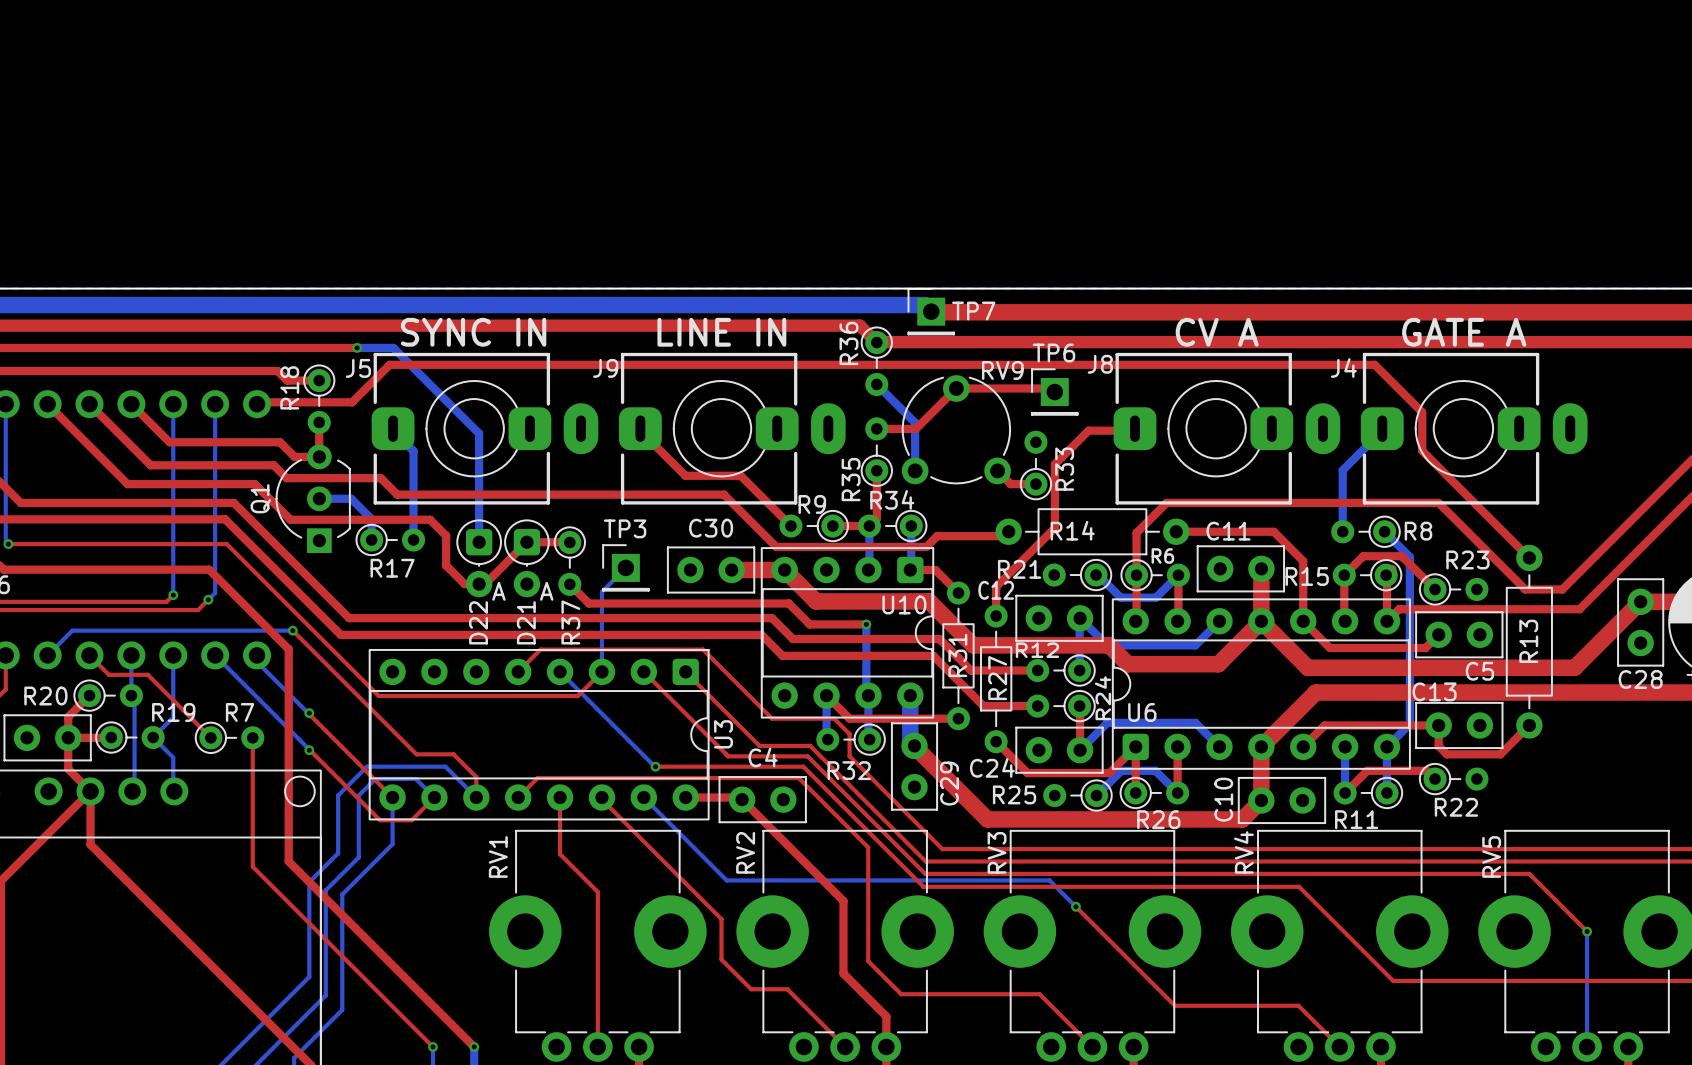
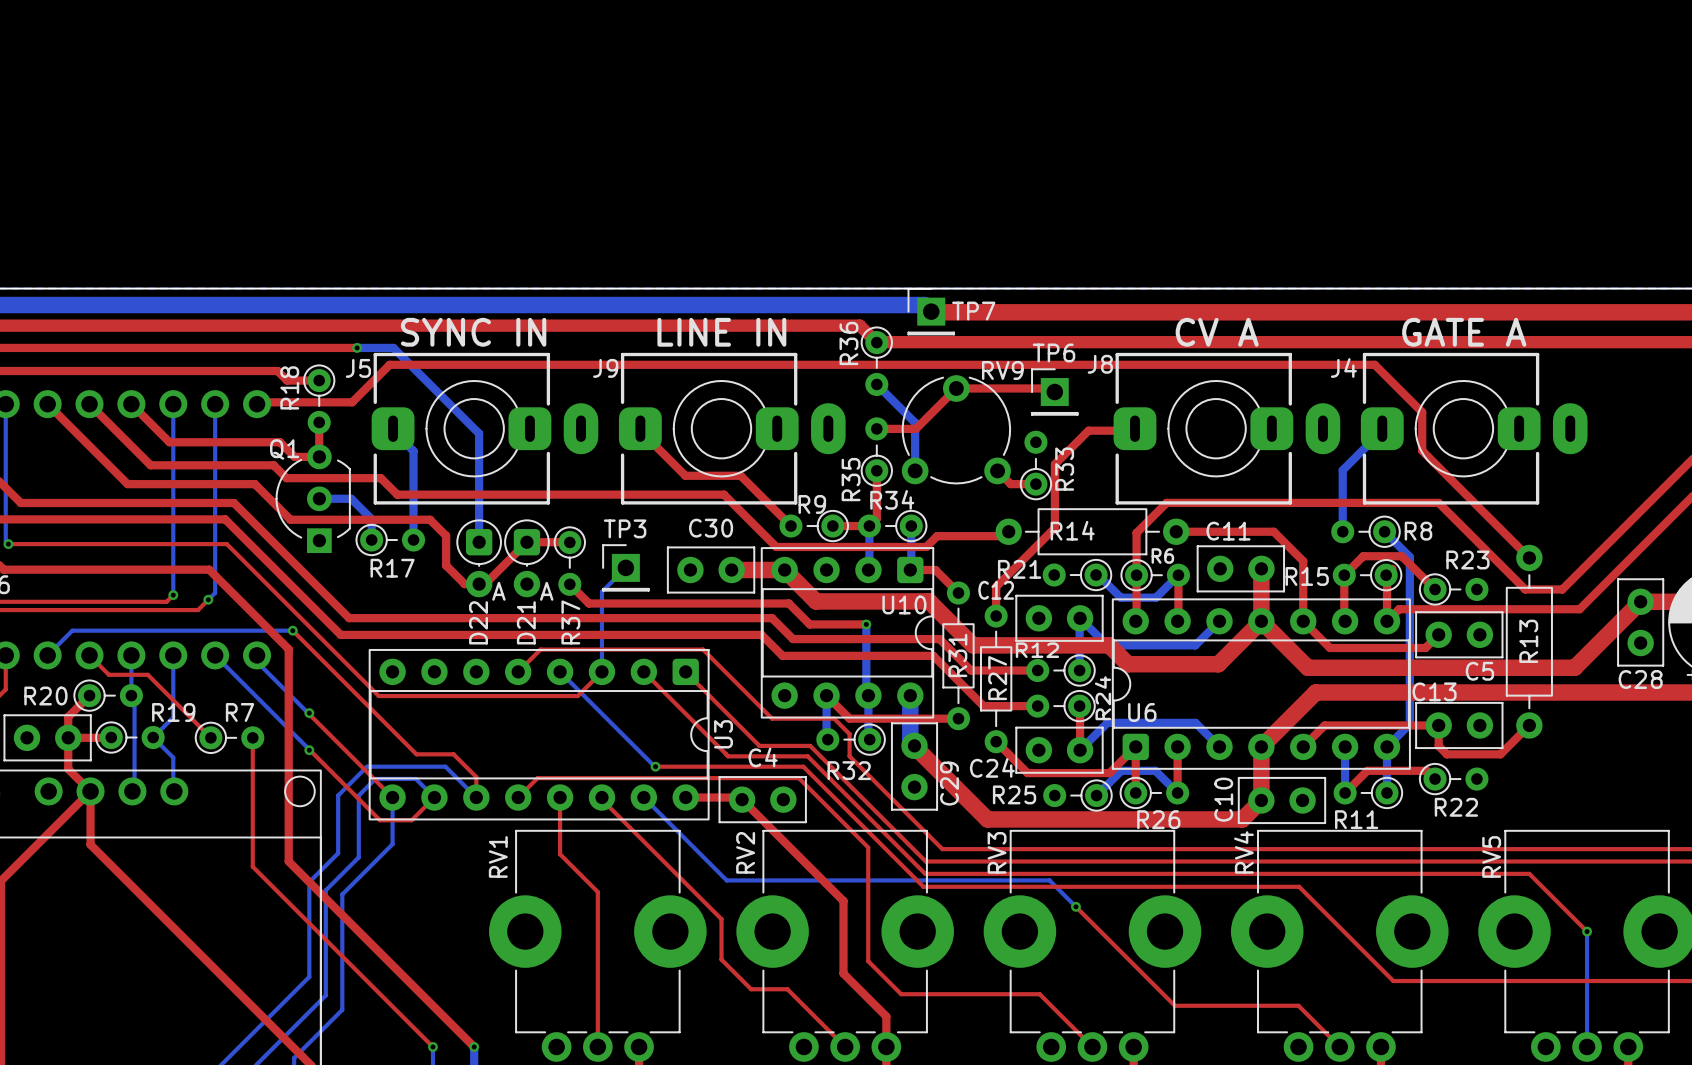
Q1 name rotation: 0° (260, 498) -> 90° clockwise (284, 449)
Q1 name position: Q1 (260, 498) -> Q1 (284, 449)

